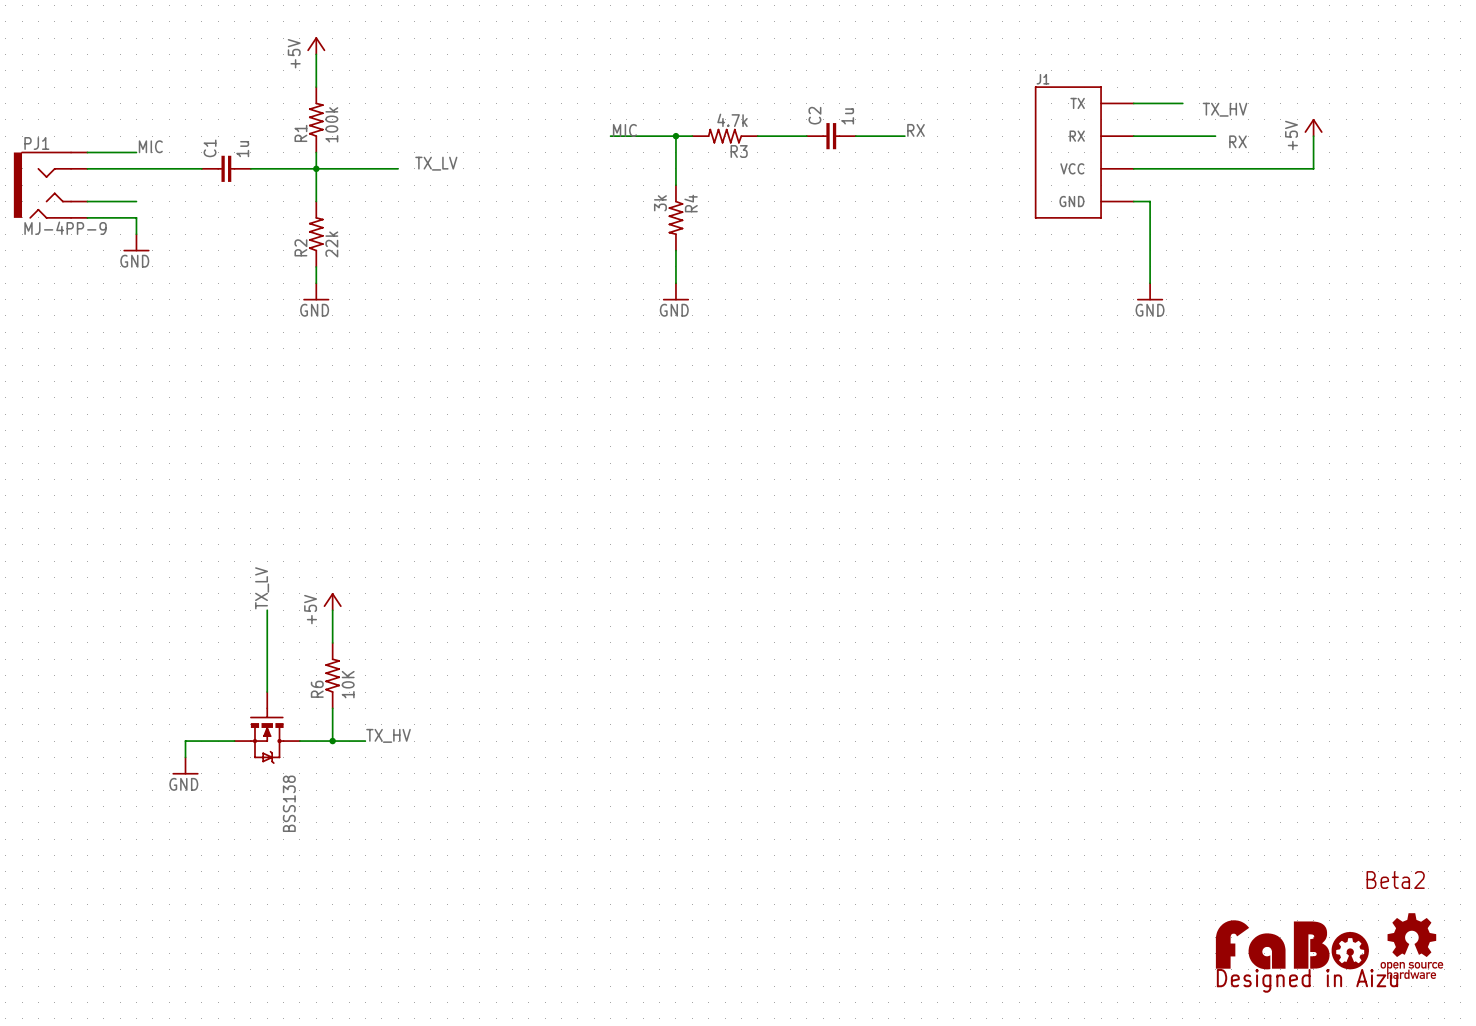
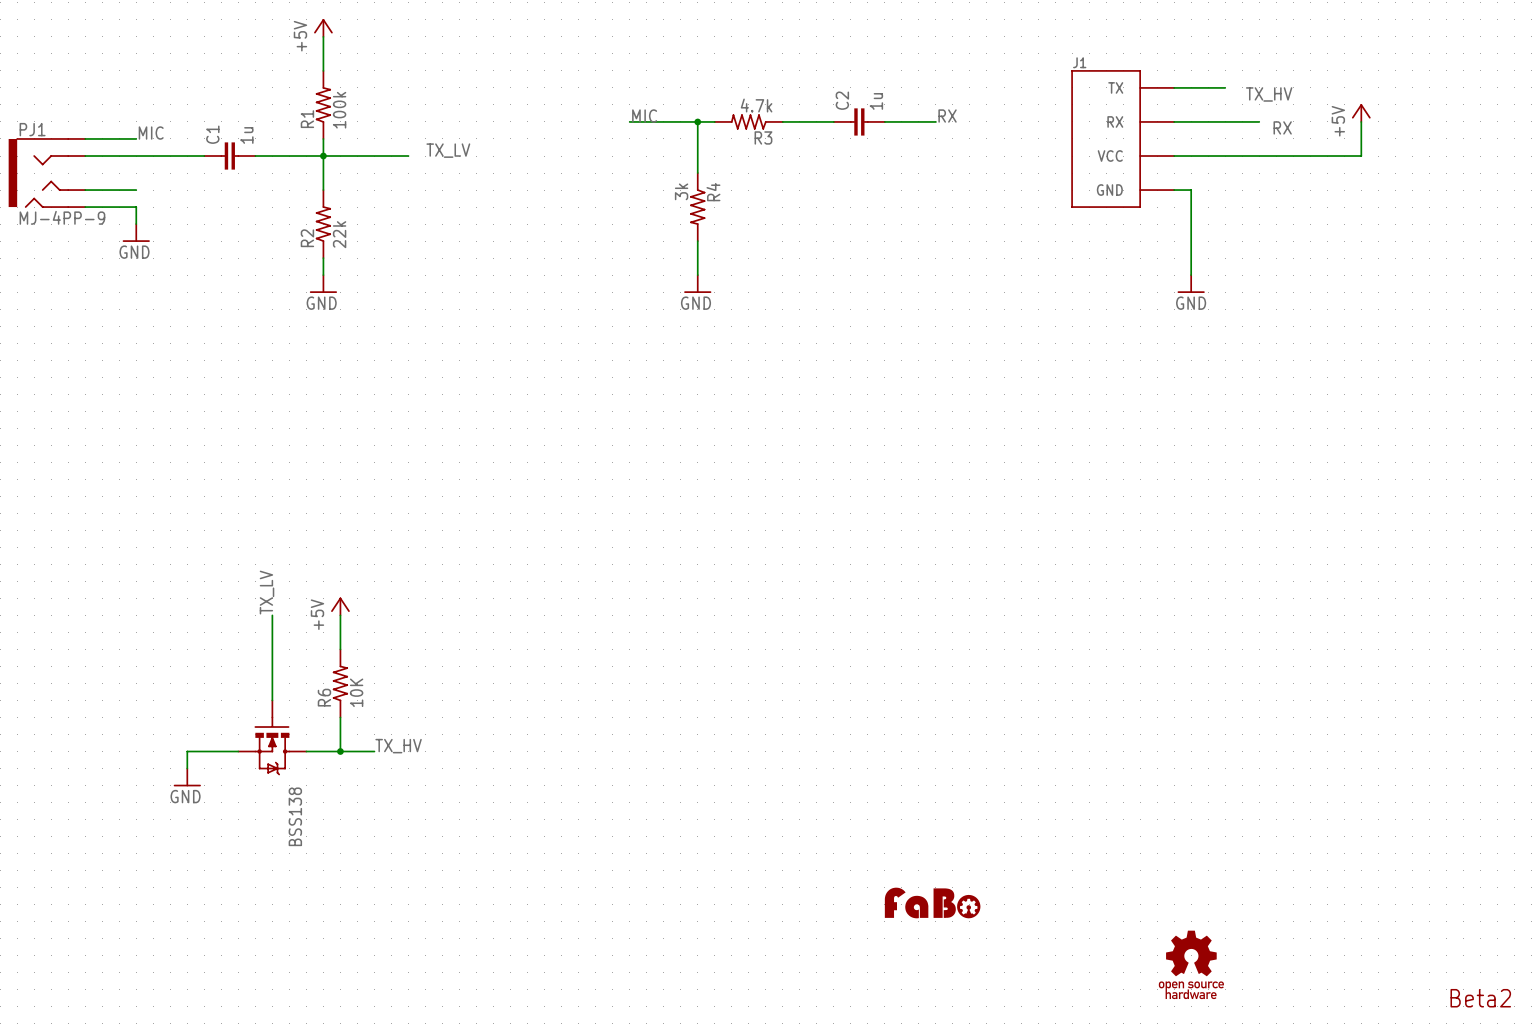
text position: Beta2 (1395, 880) -> Beta2 (1480, 998)
part: none -> (932, 902)
part: (1292, 944) -> none
part: none -> (1191, 964)
part: (1411, 946) -> none

